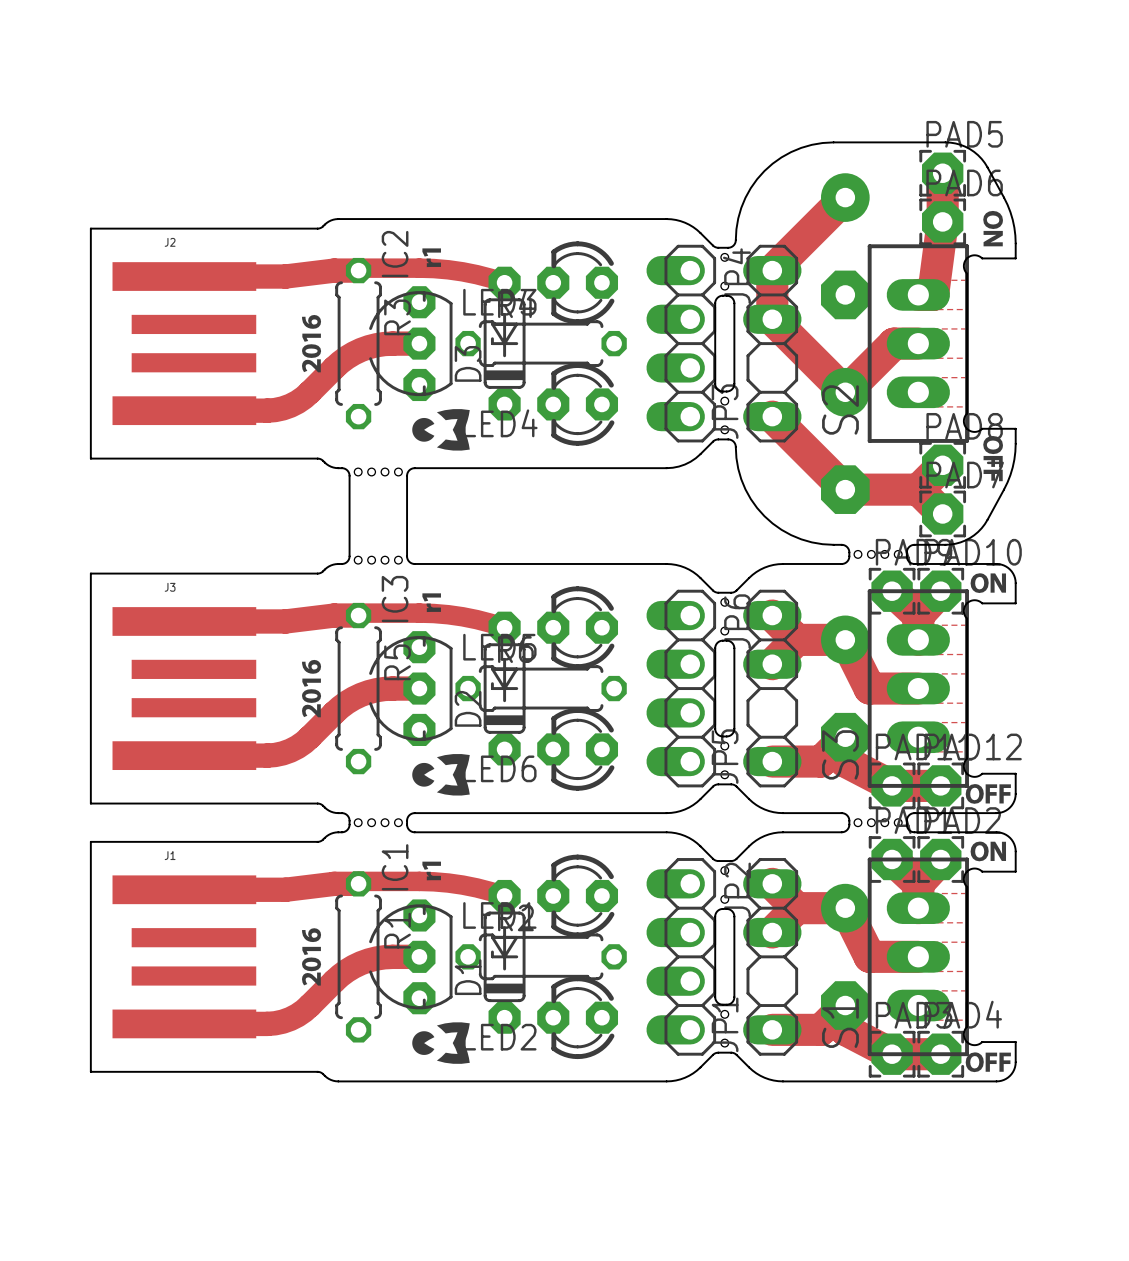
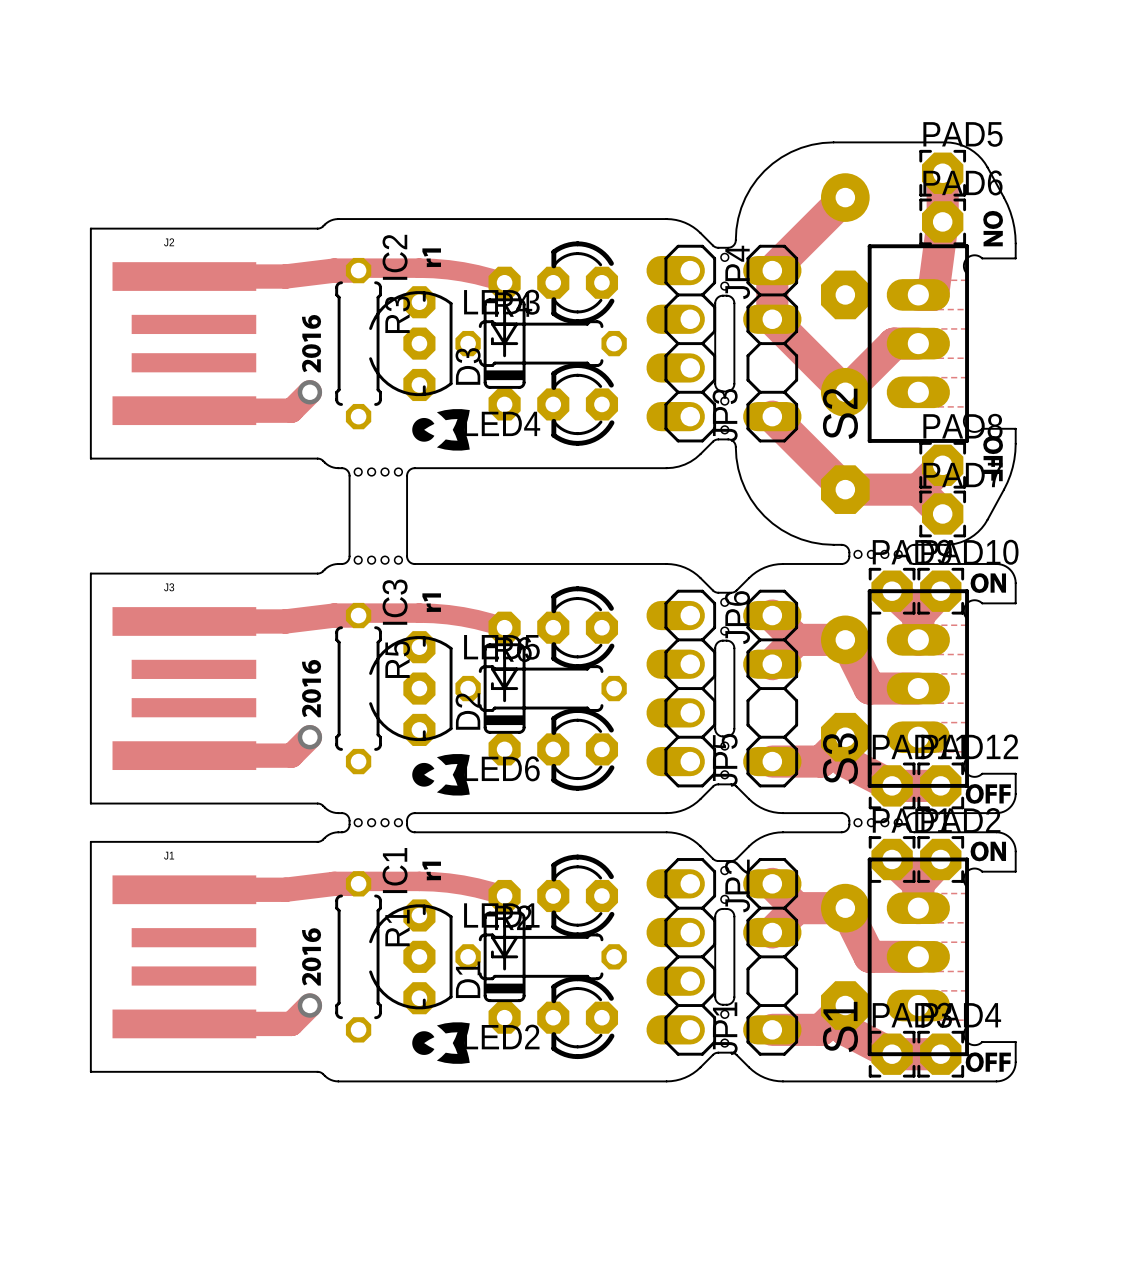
track: (419, 343) (384, 344) (361, 349) (340, 362) (297, 402) (282, 408) (267, 410) -> (309, 392) (291, 410) (267, 410)
via: none -> (309, 392)
track: (419, 688) (384, 688) (361, 694) (340, 707) (297, 747) (282, 753) (267, 755) -> (309, 737) (291, 755) (267, 755)
via: none -> (309, 737)
track: (419, 956) (384, 957) (361, 963) (340, 975) (297, 1015) (282, 1021) (267, 1023) -> (309, 1005) (291, 1023) (267, 1023)
via: none -> (309, 1005)

